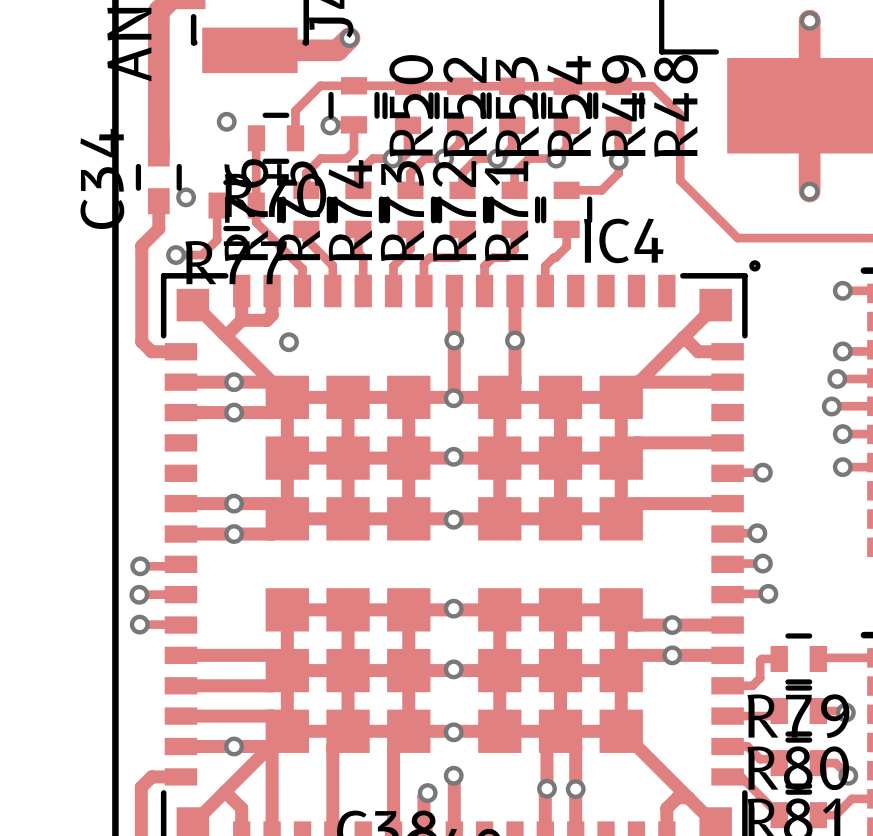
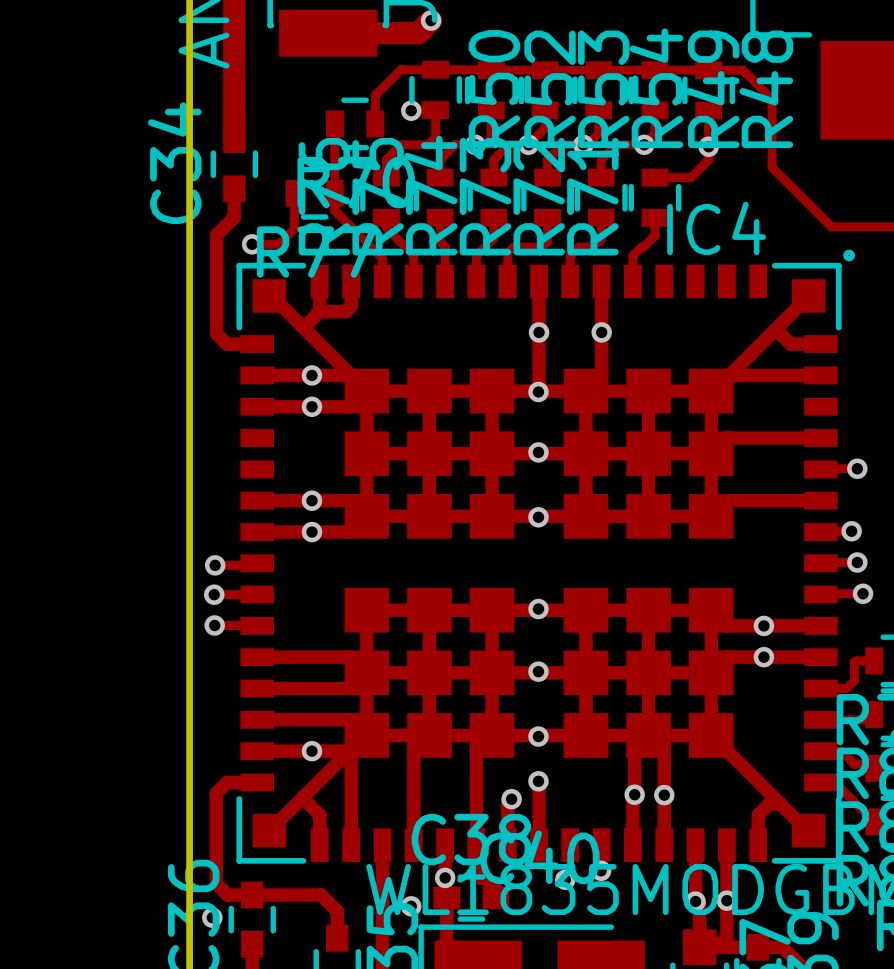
via: (226, 121) -> none
via: (186, 197) -> none
via: (288, 342) -> none

